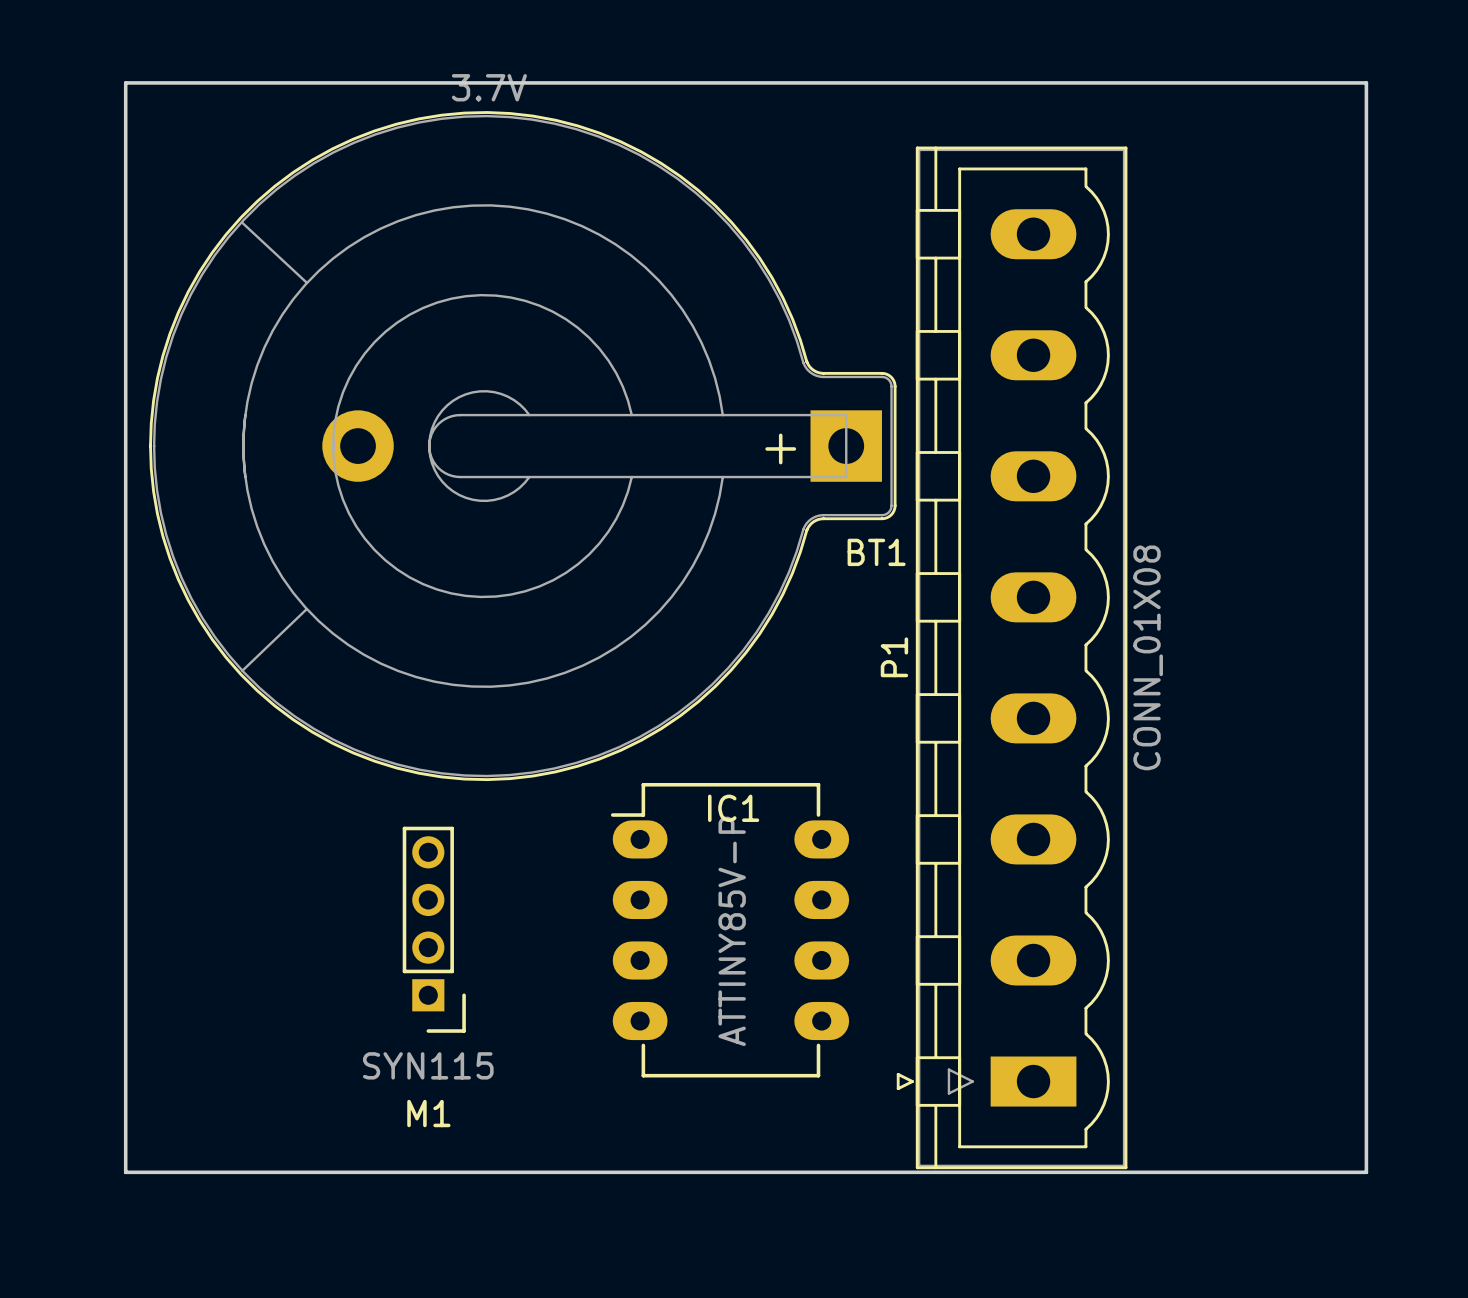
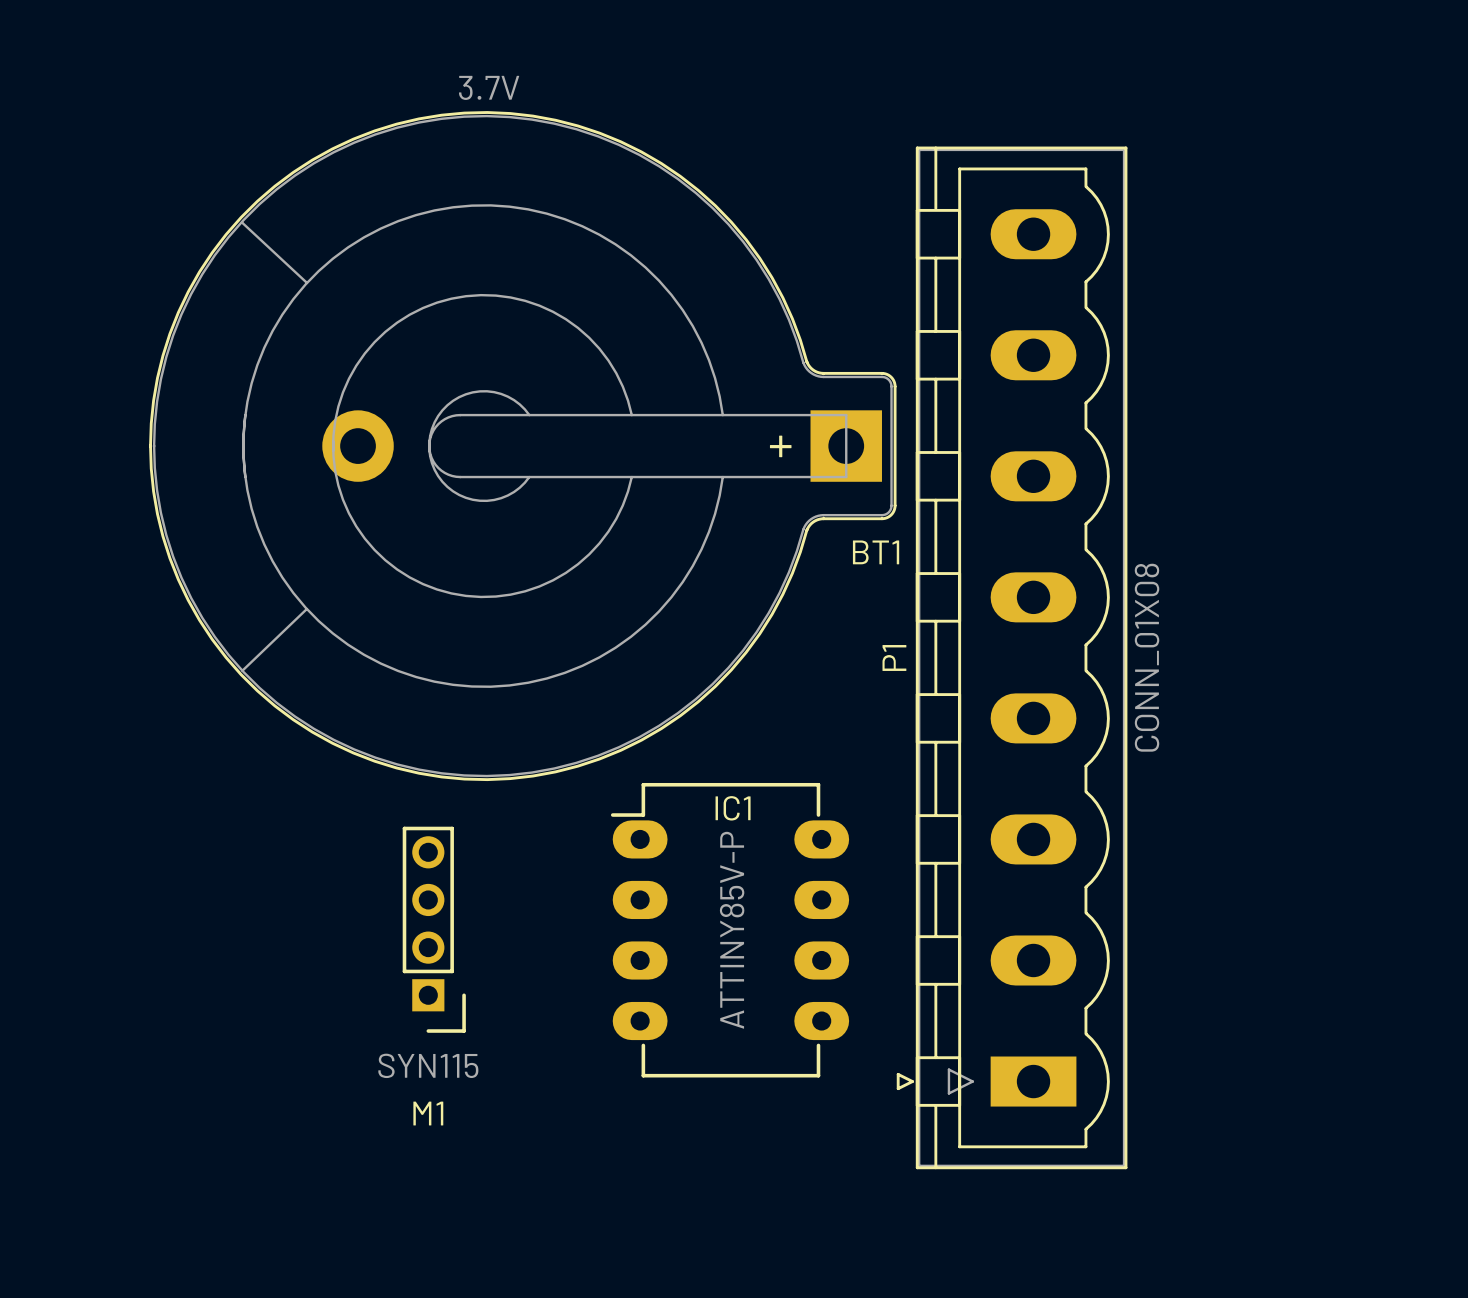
board edge: (125, 82) (125, 1172) (1366, 1172) (1366, 82) (125, 82) -> none

